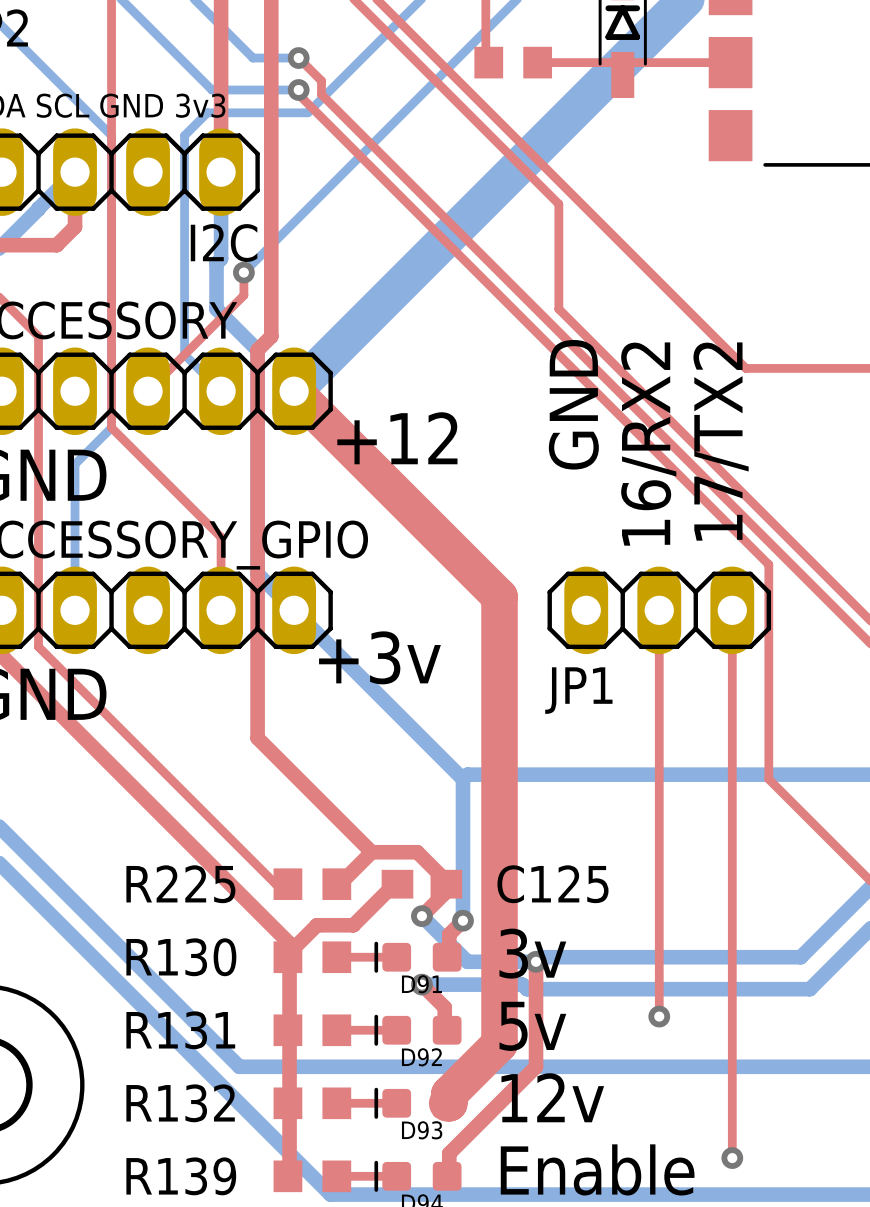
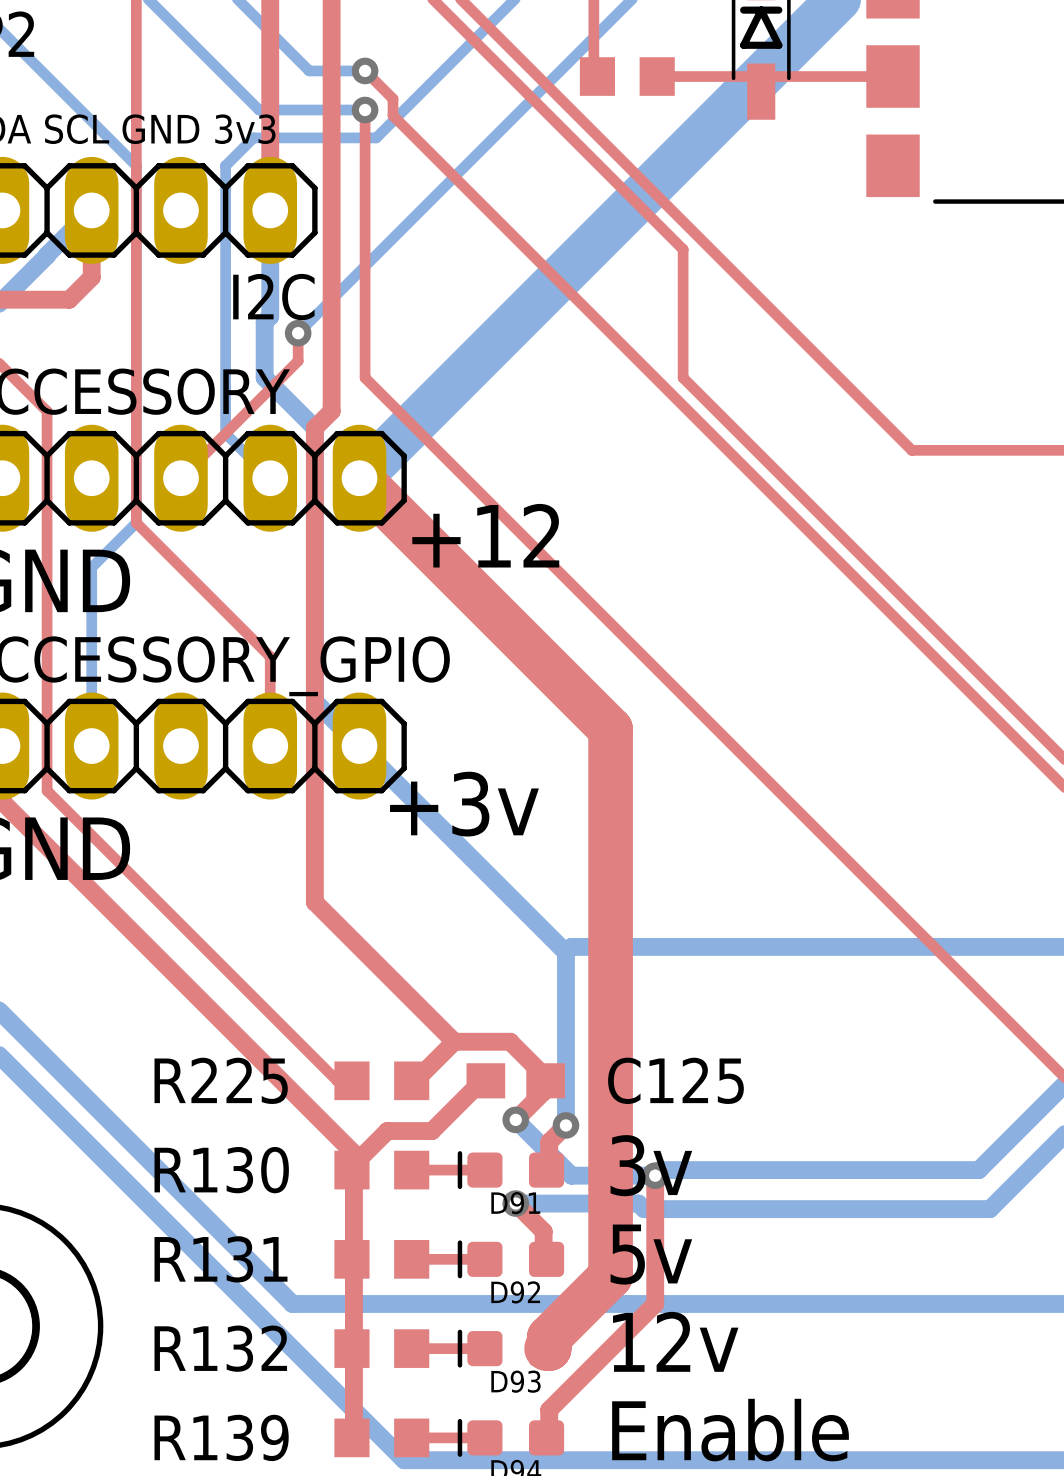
top track: (298, 94) (768, 564) (768, 779) -> (365, 115) (365, 377) (939, 952)
text: GND (573, 404) -> none
text: 17/TX2 (721, 441) -> none
text: 16/RX2 (648, 444) -> none
top track: (659, 610) (659, 1016) -> none
JP1: (659, 610) -> none
top track: (732, 610) (732, 1158) -> none
via: (659, 1016) -> none
via: (732, 1158) -> none

